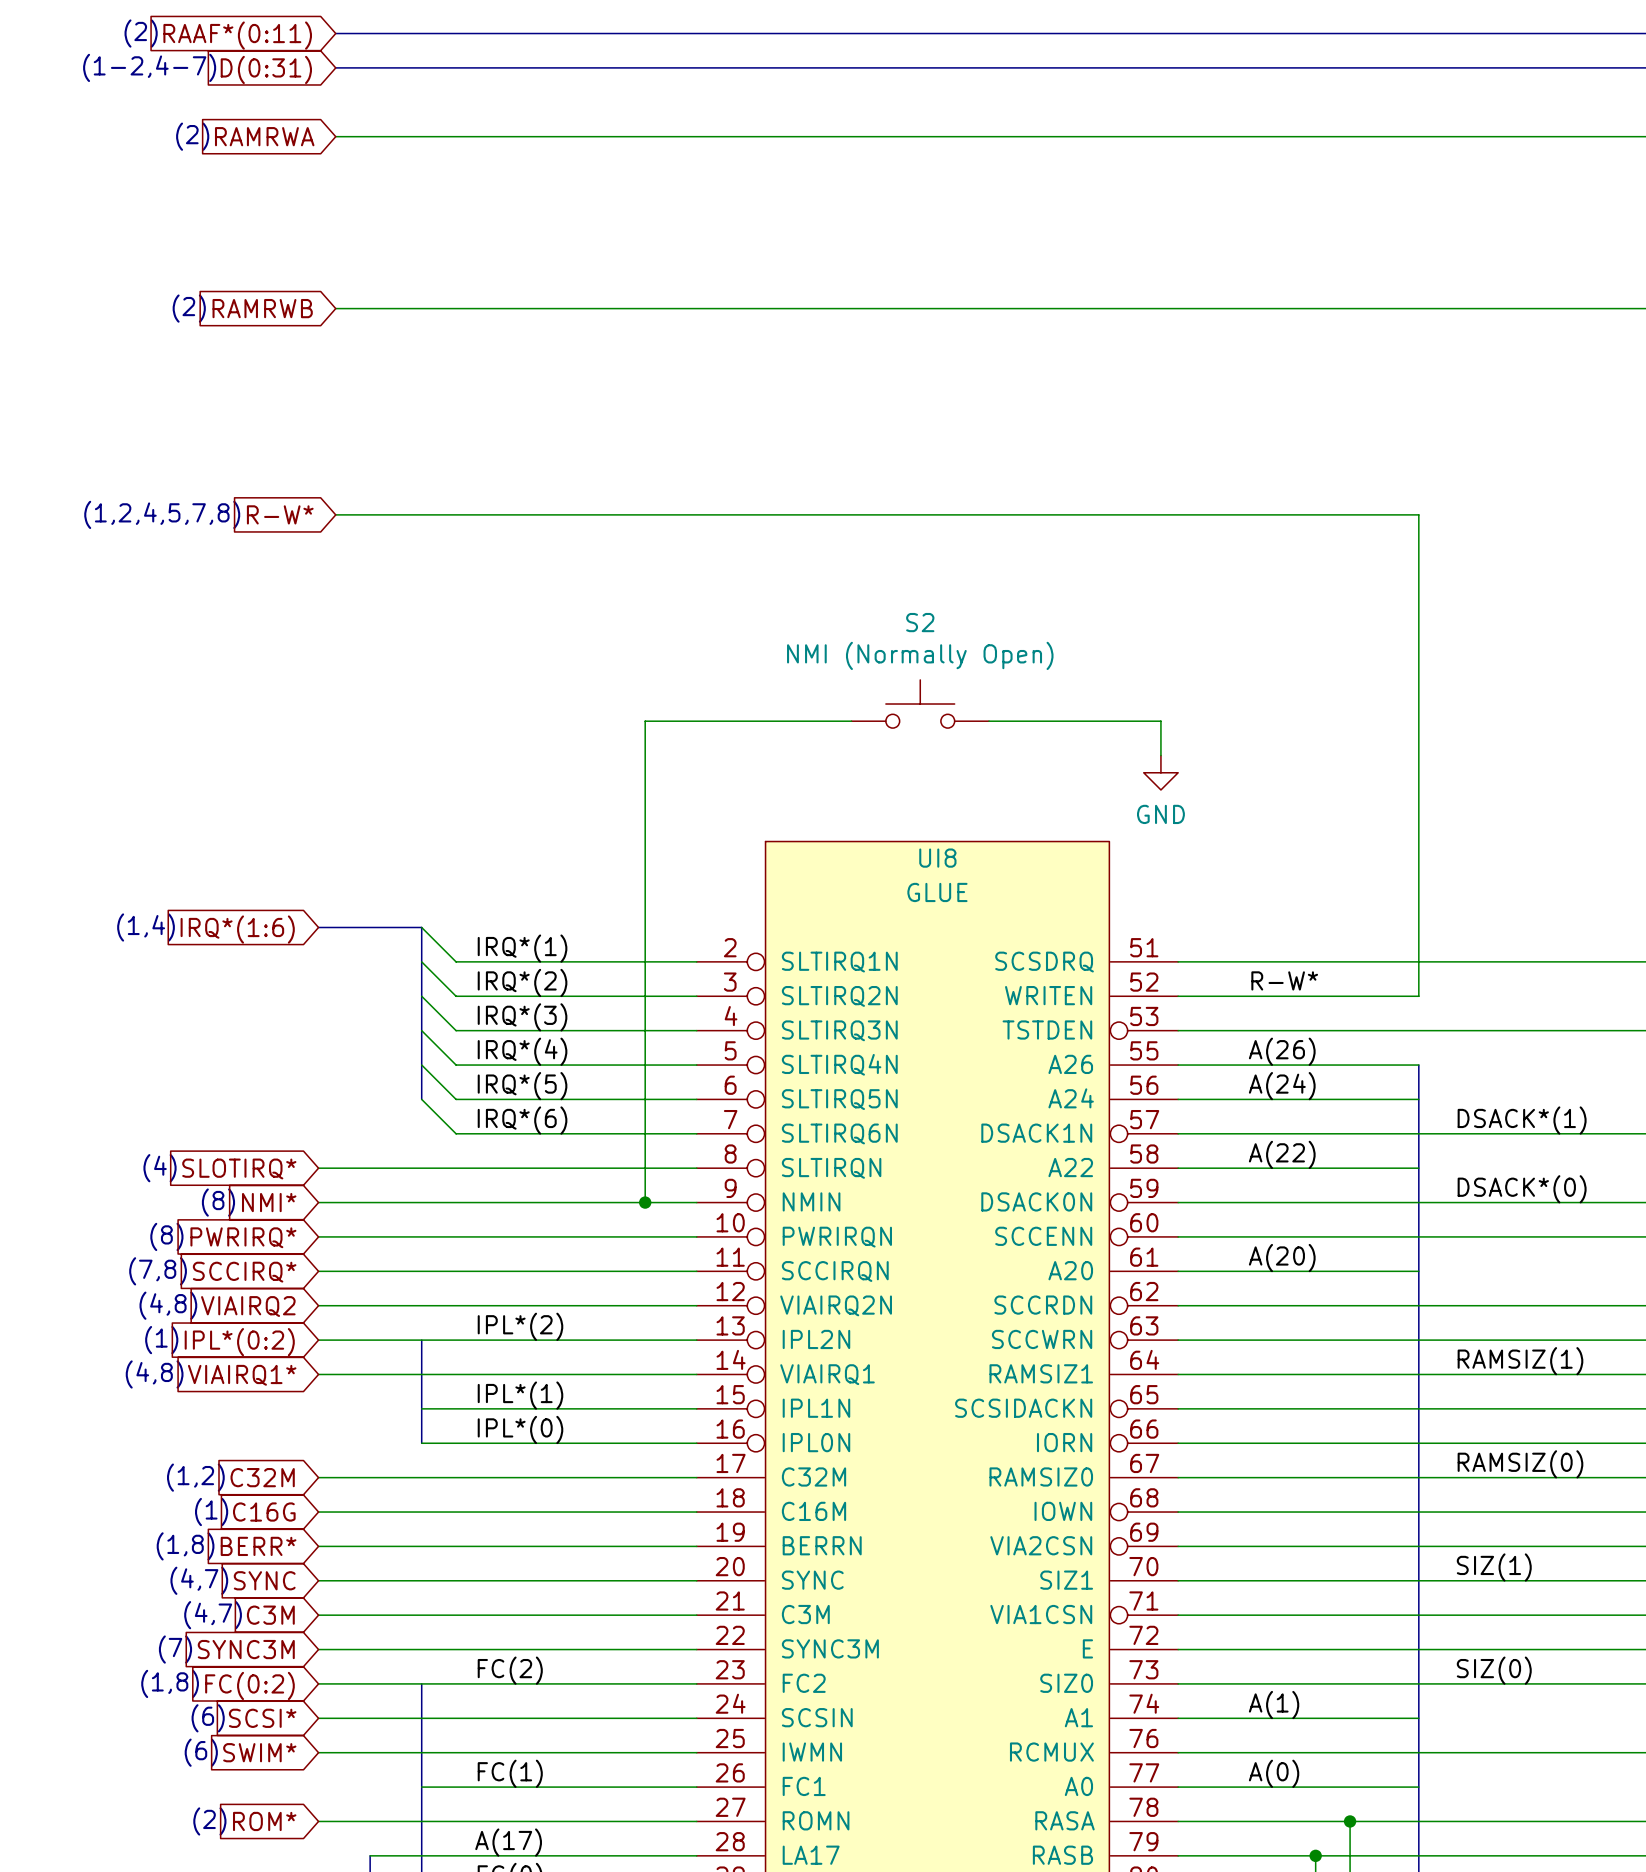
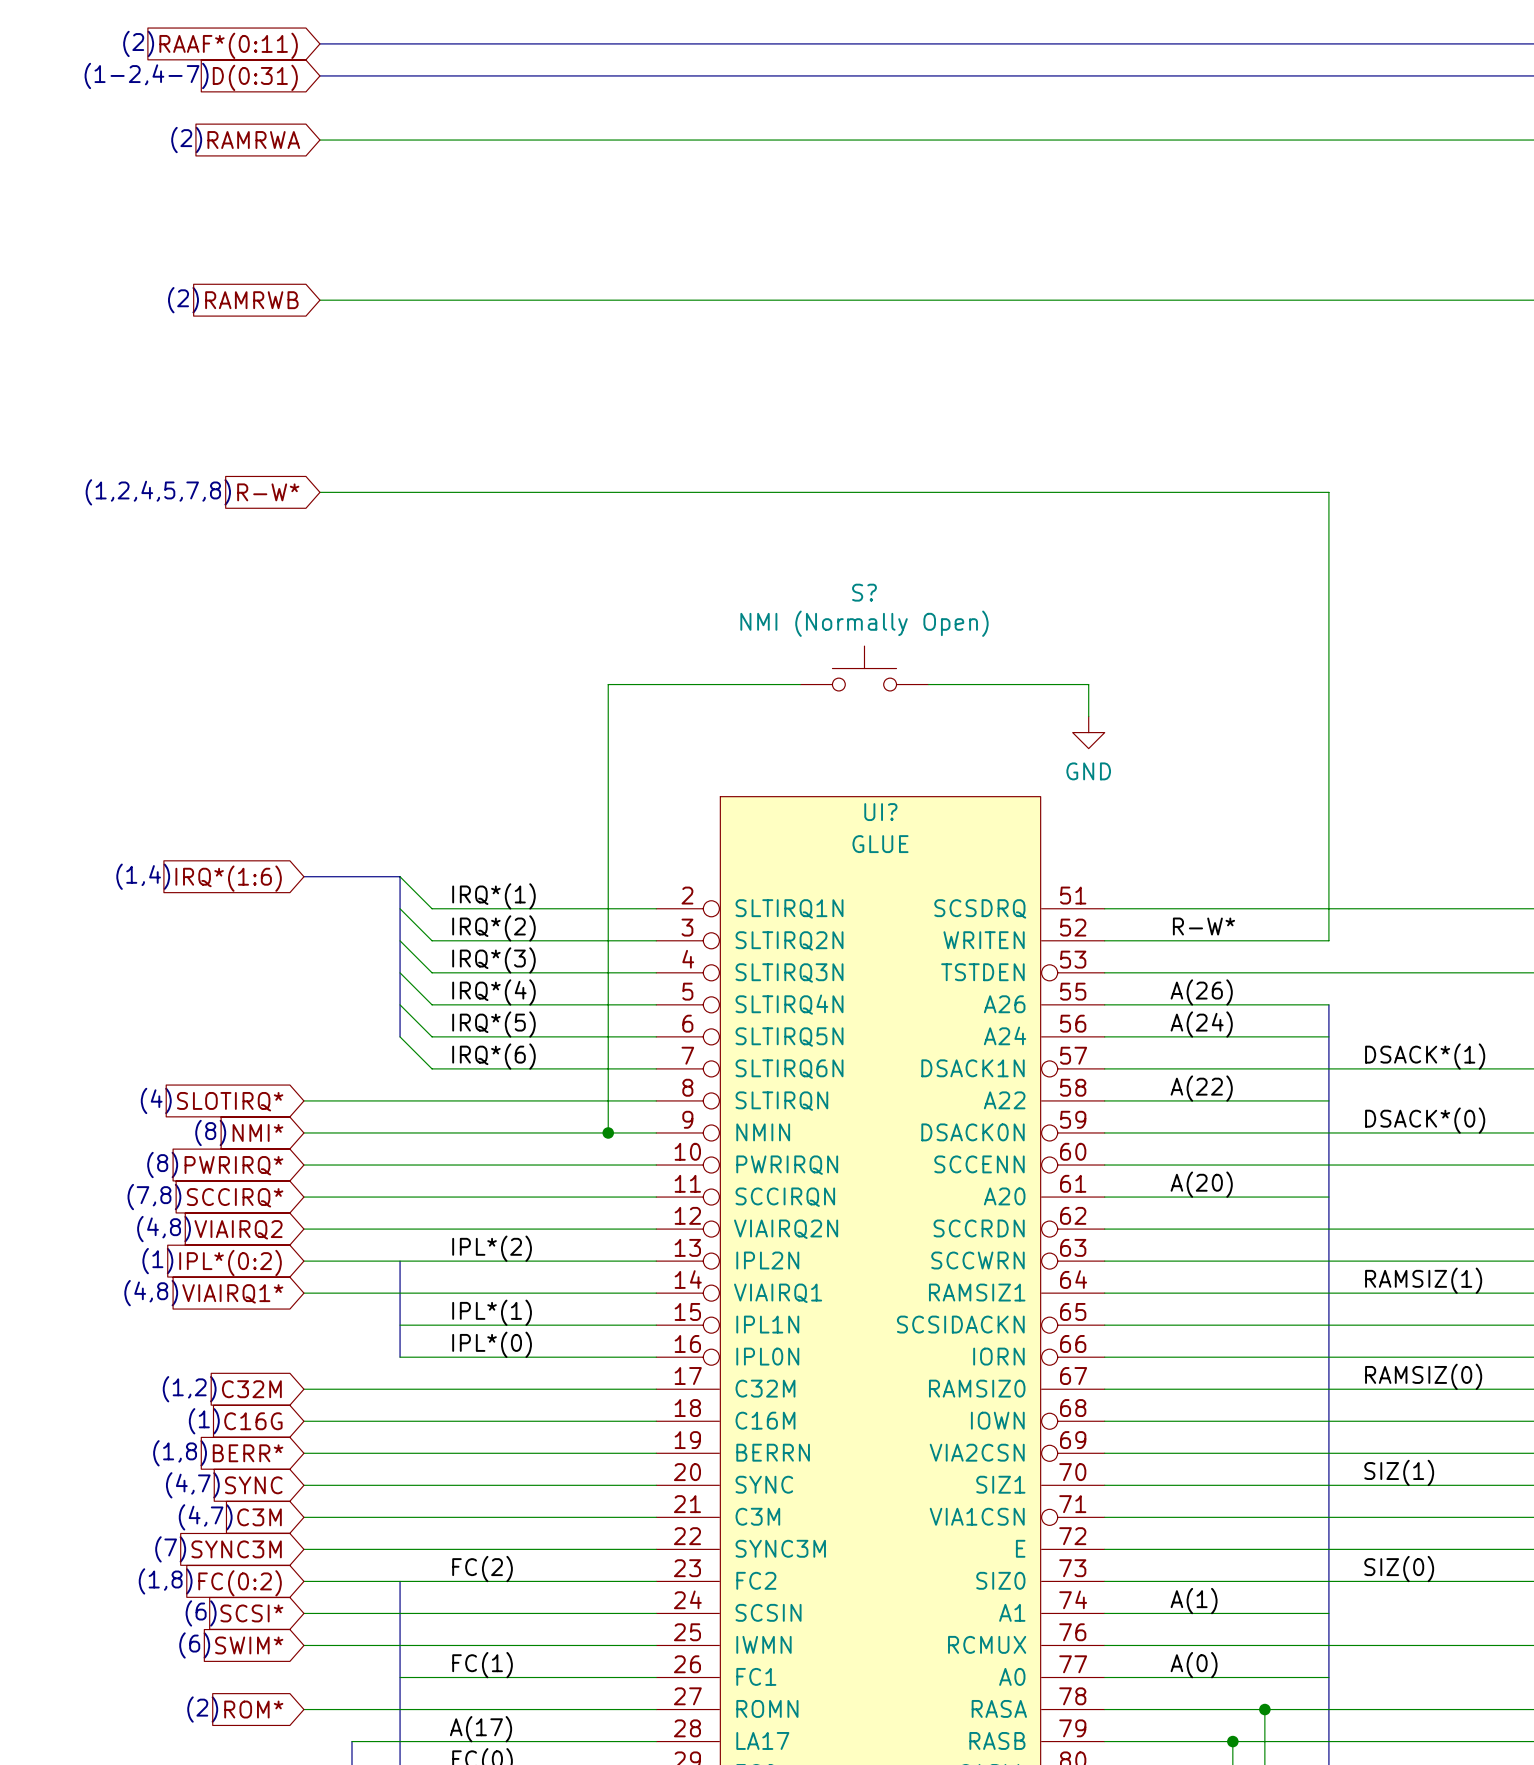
S2 name: S2 (920, 622) -> S? (864, 592)
UI8 name: UI8 (937, 858) -> UI? (880, 812)

